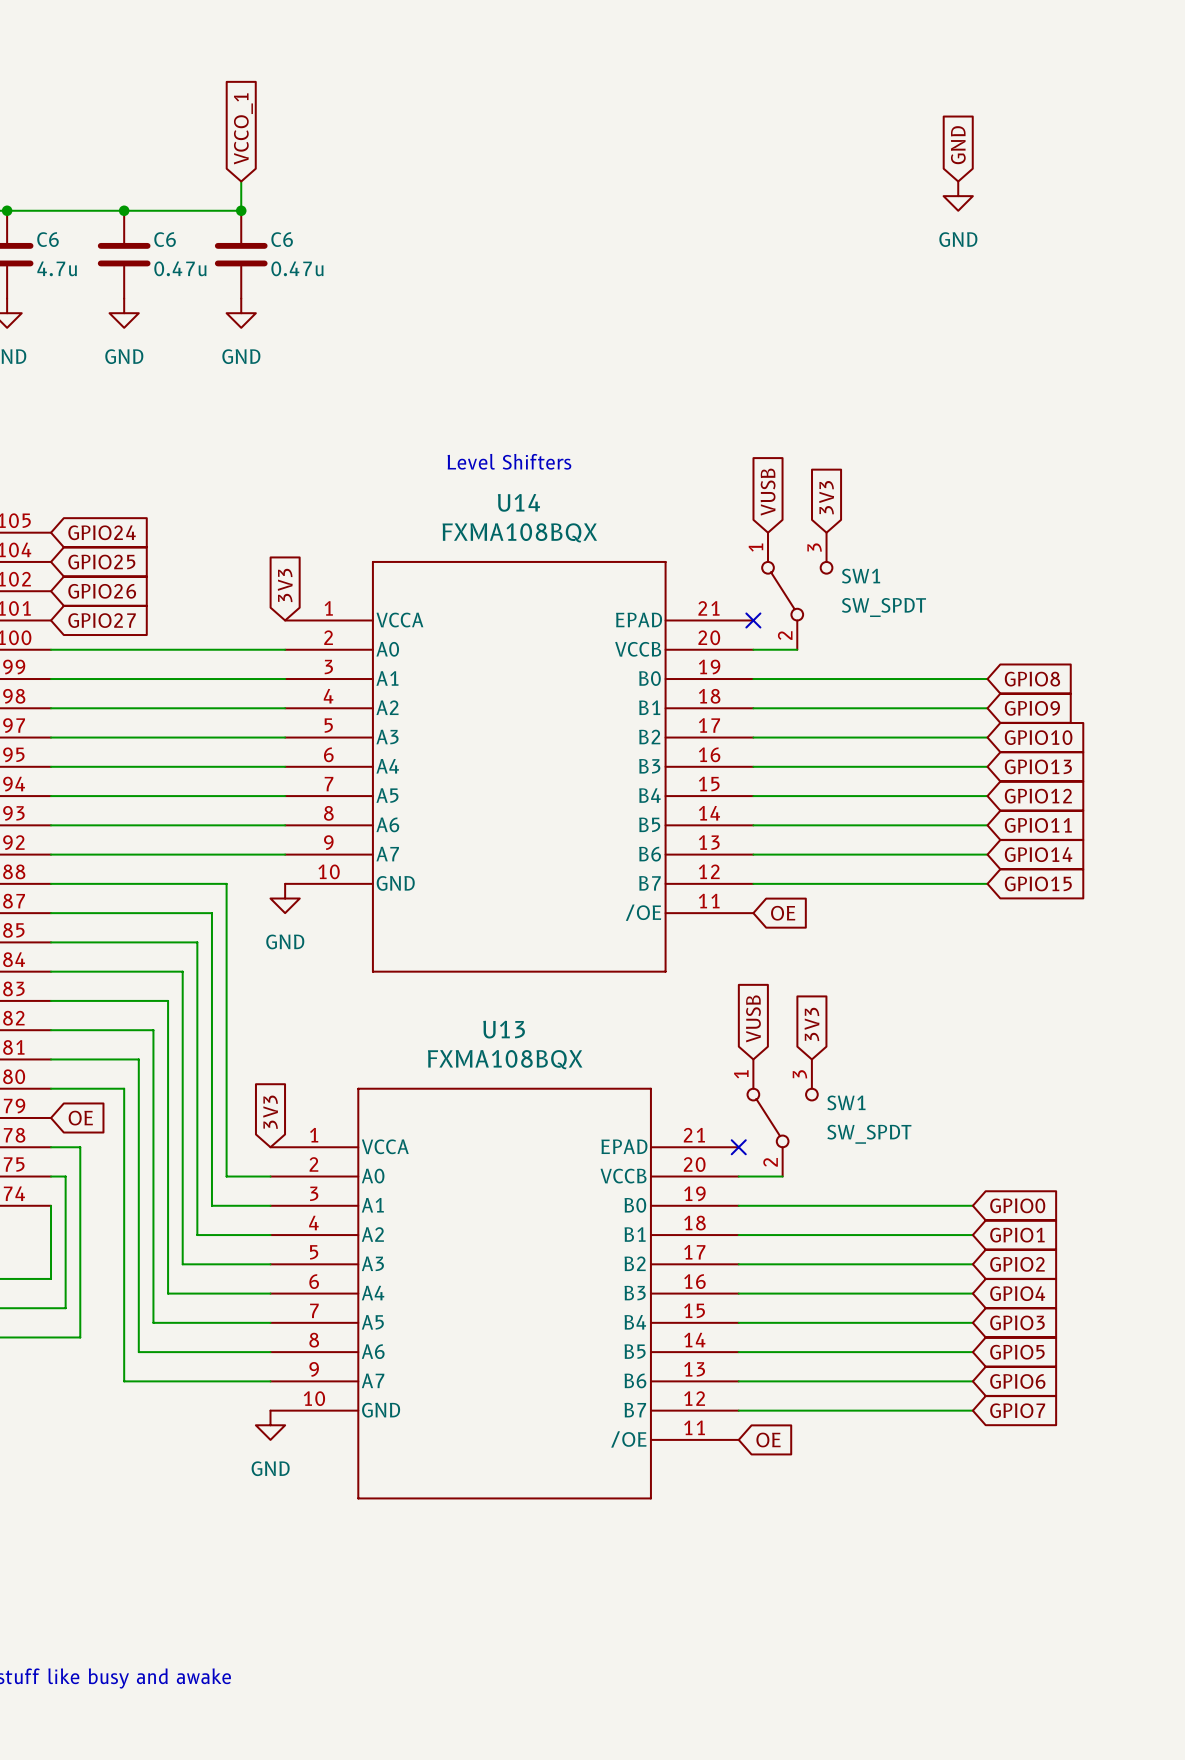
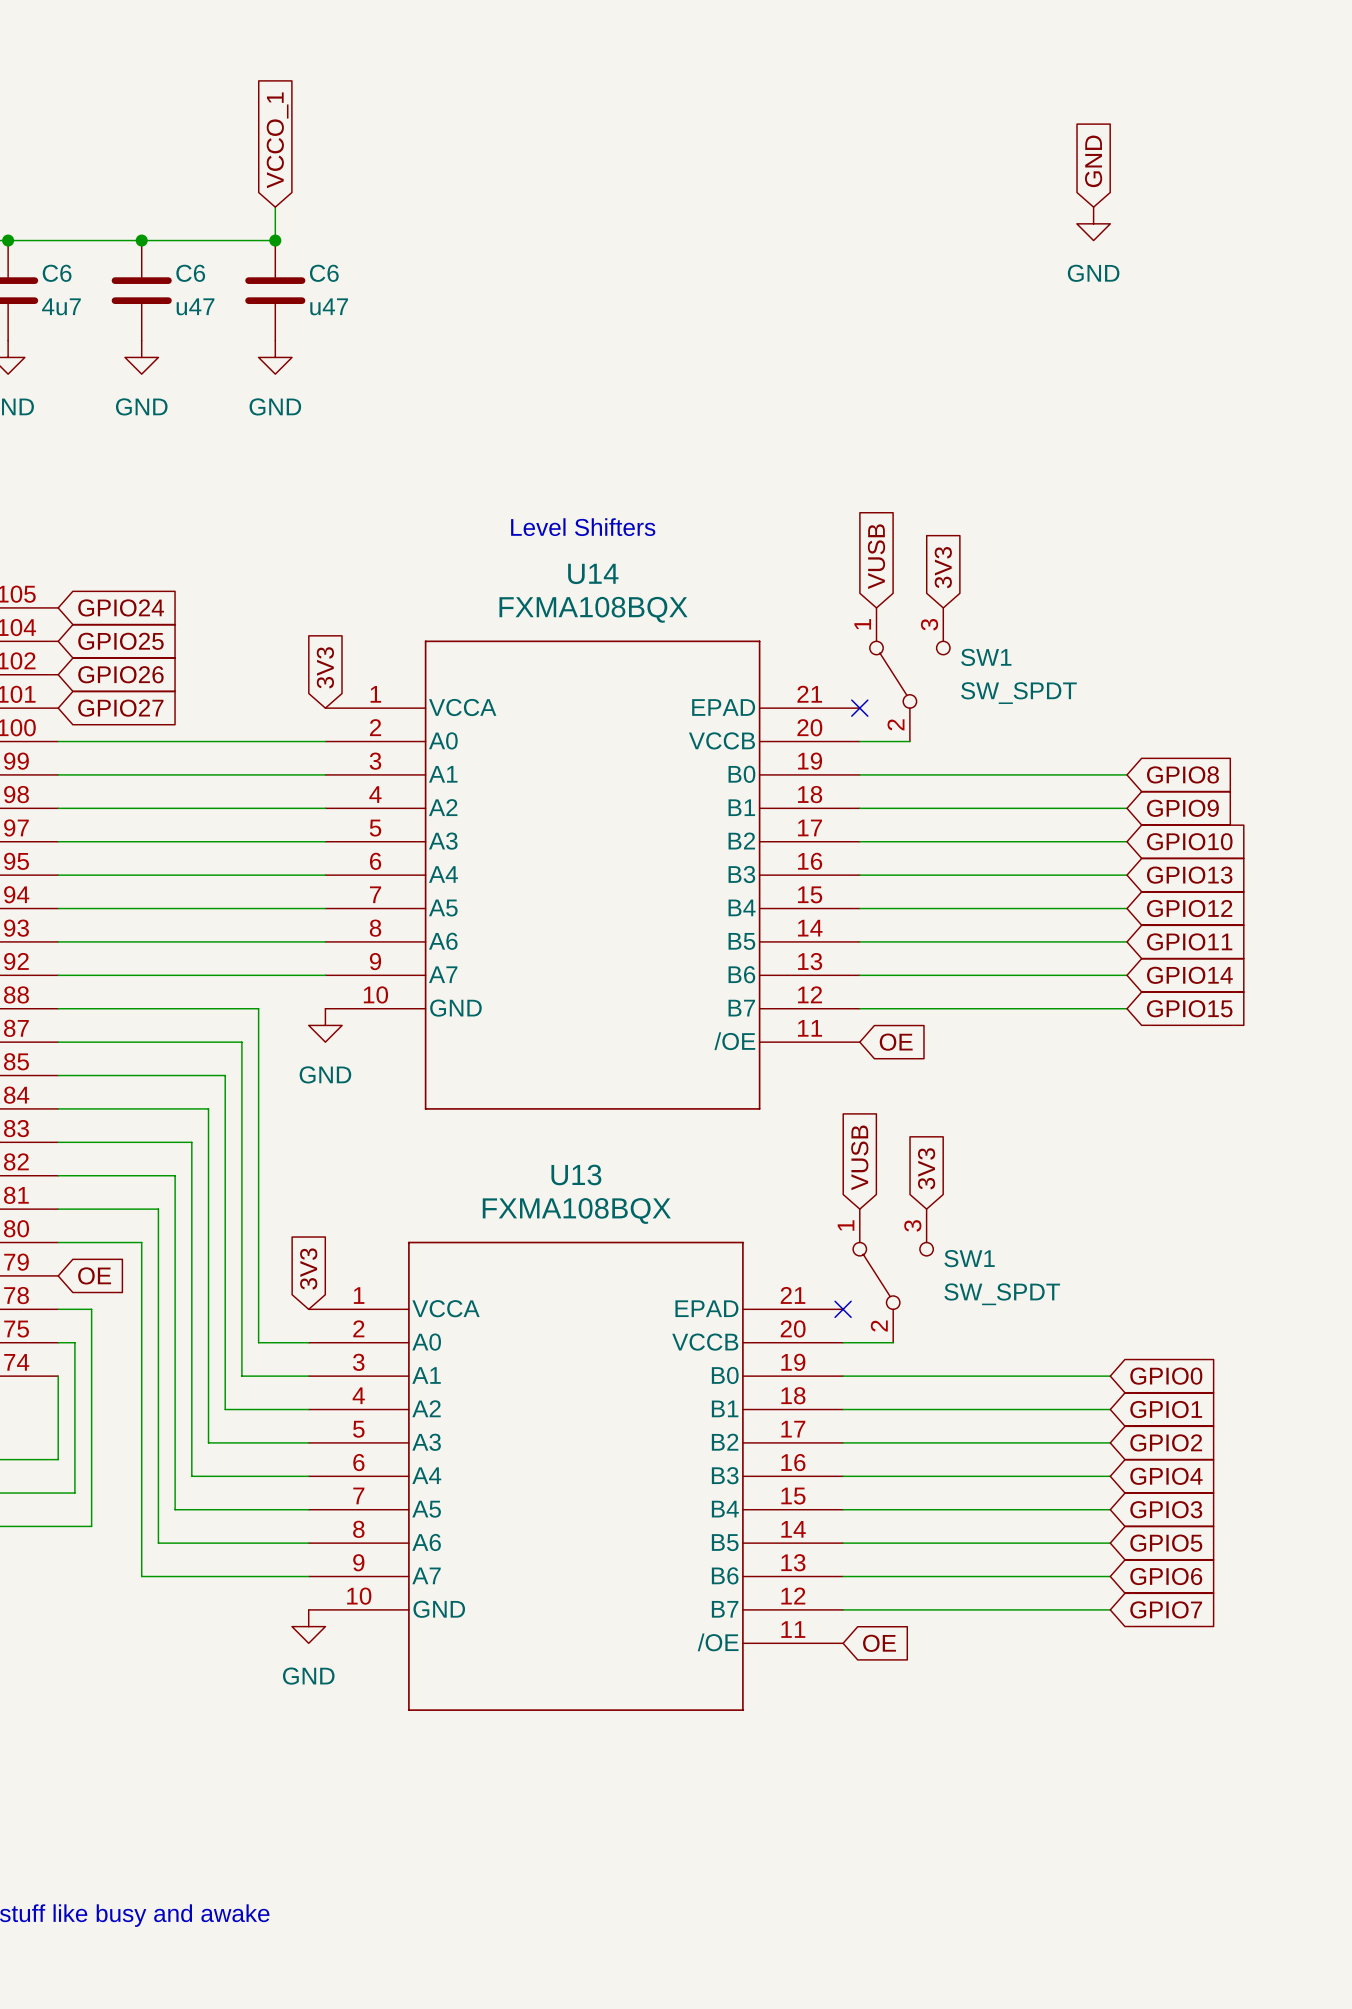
C6 value: 4.7u (57, 268) -> 4u7 (61, 306)
C6 value: 0.47u (180, 268) -> u47 (195, 306)
C6 value: 0.47u (297, 268) -> u47 (329, 306)

